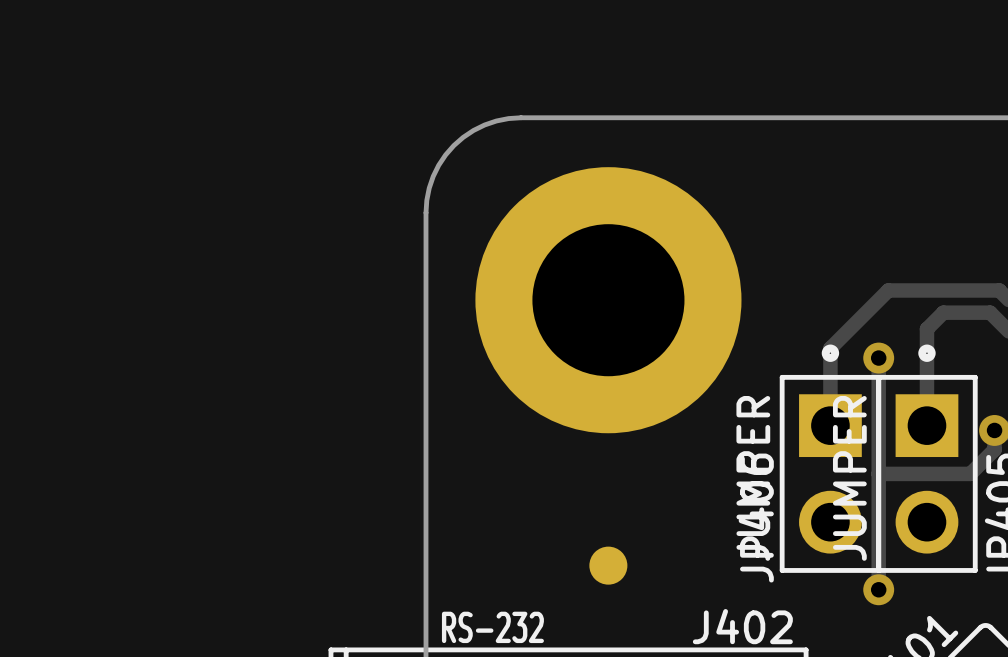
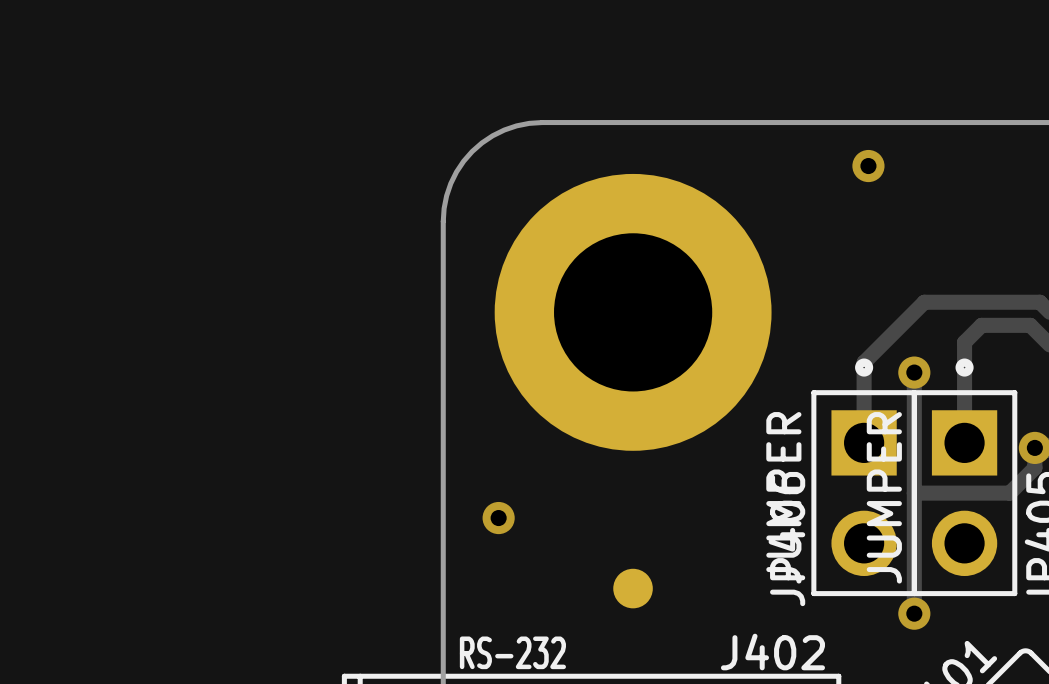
via: none -> (868, 166)
via: none -> (498, 518)

